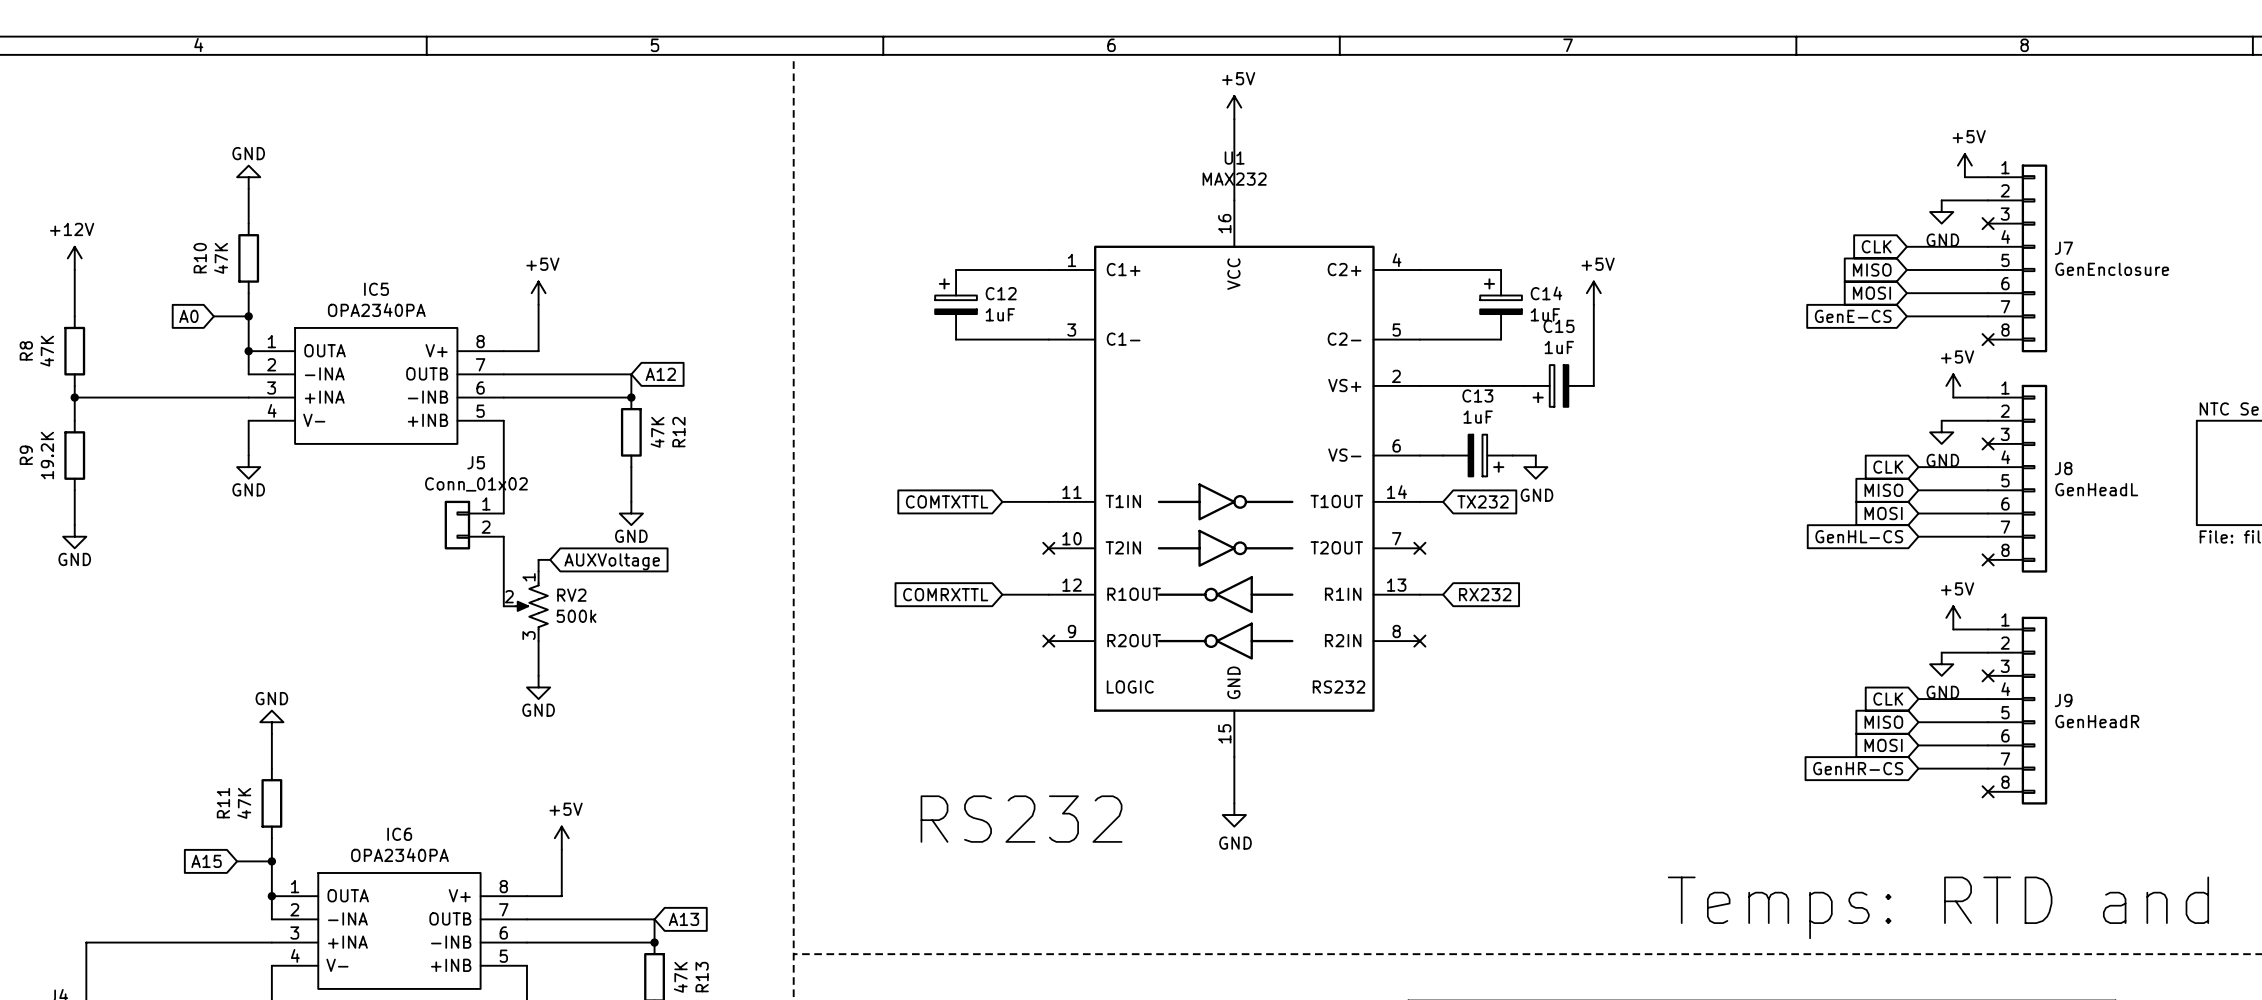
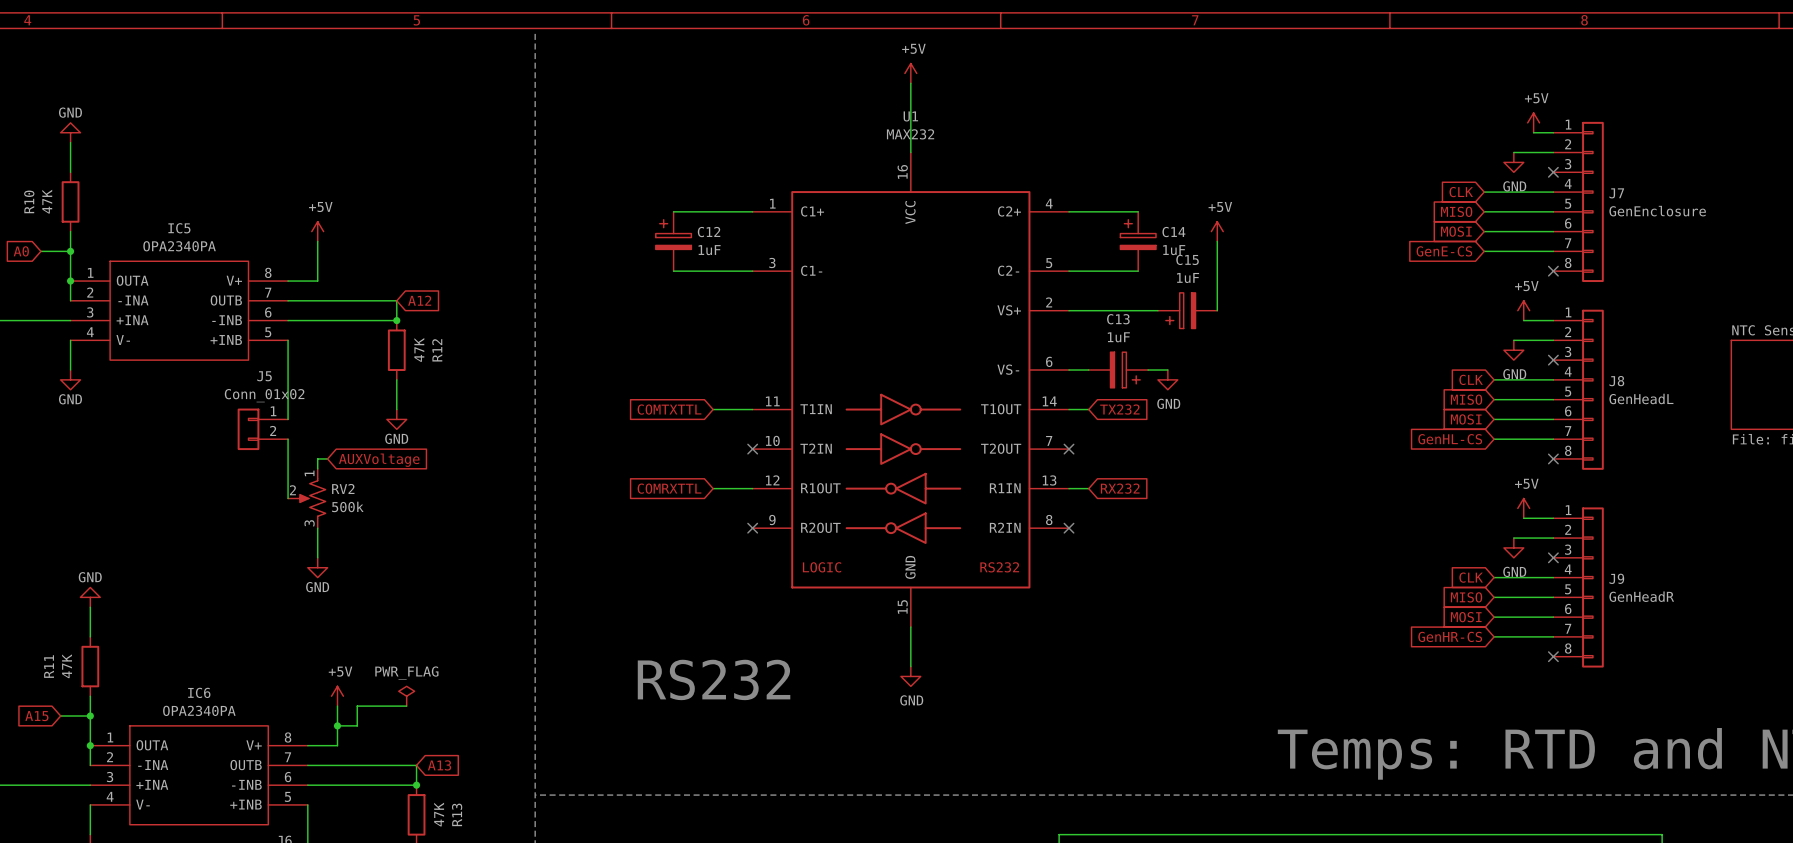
power symbol: none -> PWR_FLAG (406, 696)
wire: none -> (406, 706) (357, 706) (357, 725) (337, 725)
junction: none -> (337, 725)

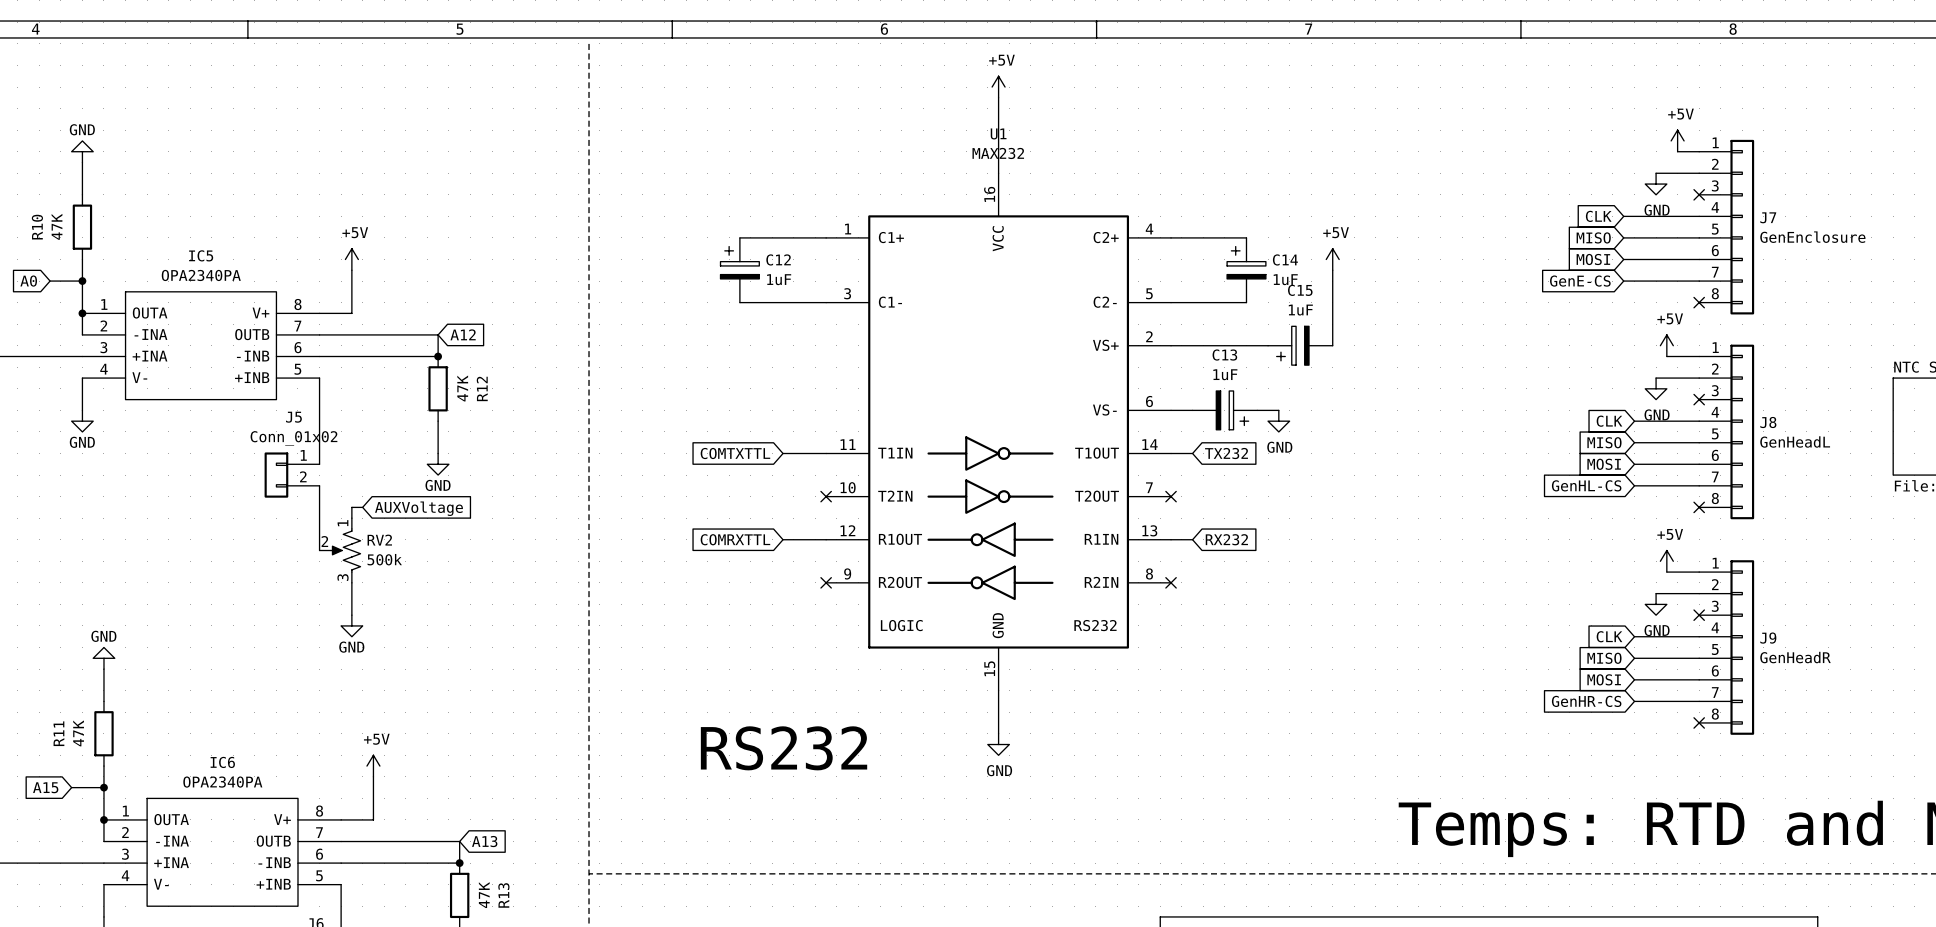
power symbol: PWR_FLAG (406, 696) -> none
wire: (406, 706) (357, 706) (357, 725) (337, 725) -> none
junction: (337, 725) -> none

